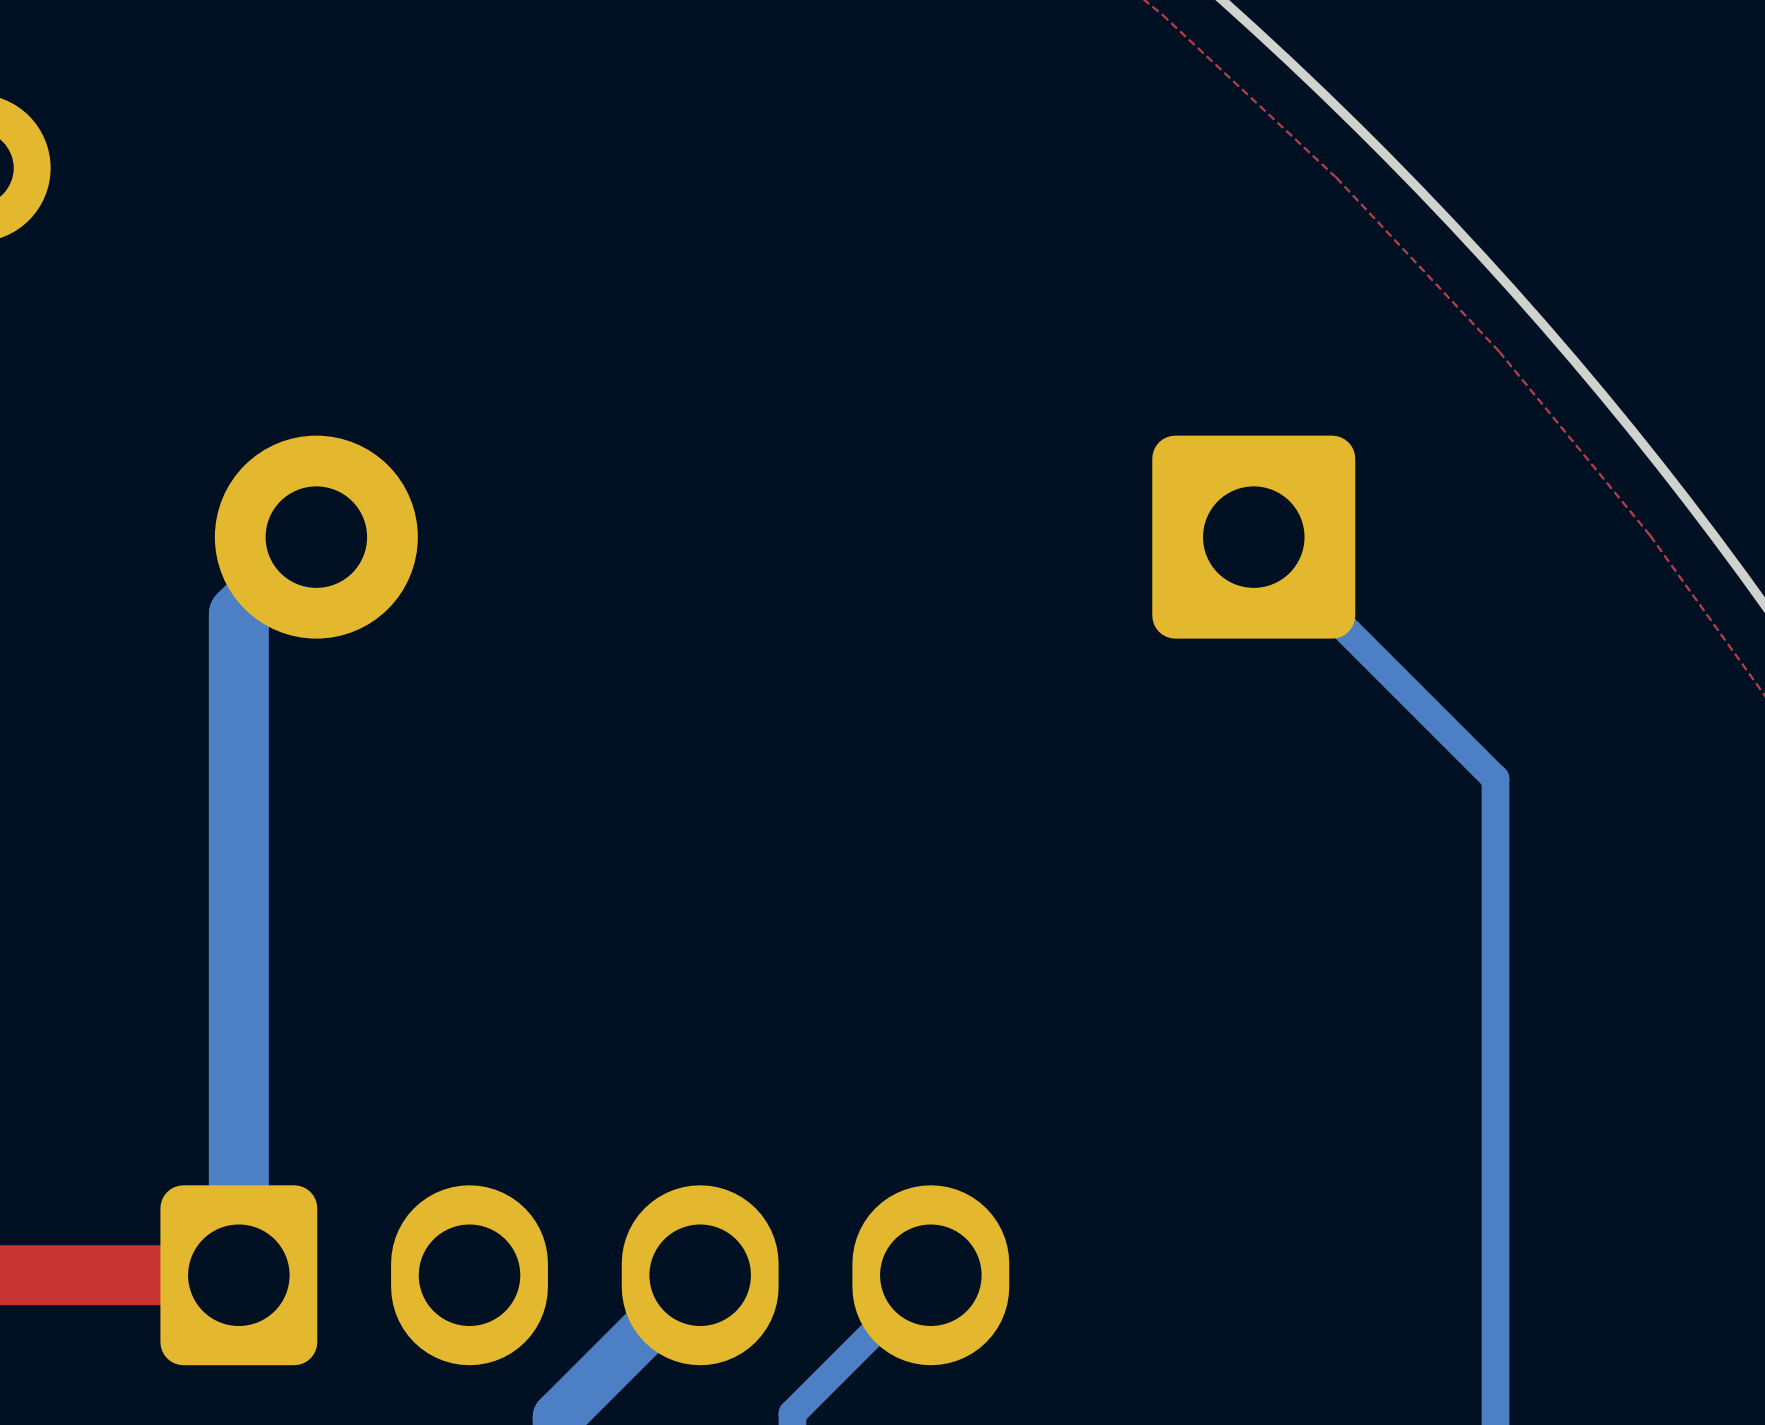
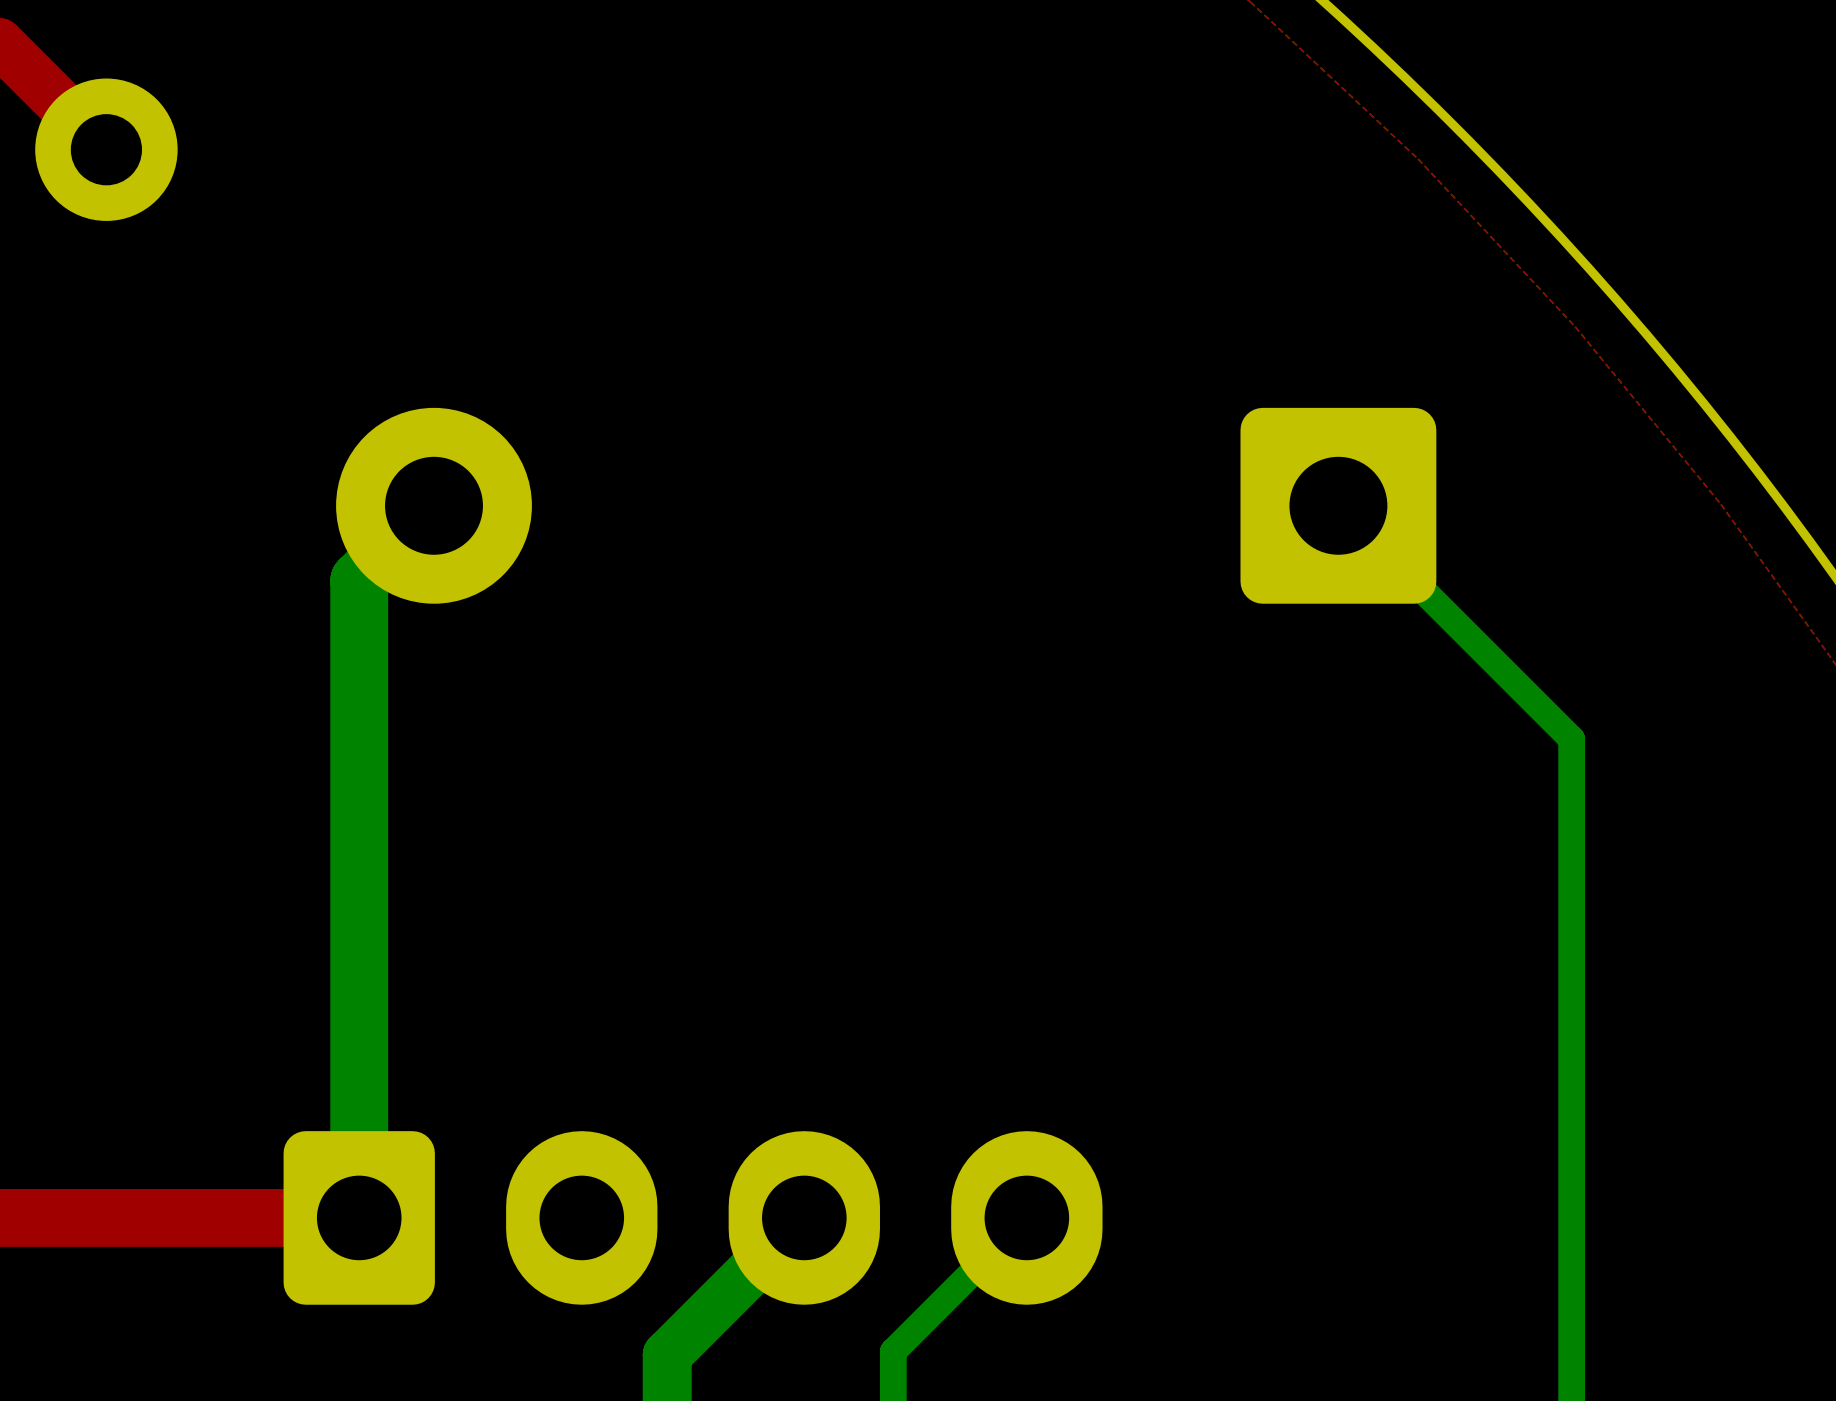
part footprint: [160, 1185, 1010, 1366] -> [283, 1131, 1103, 1305]

